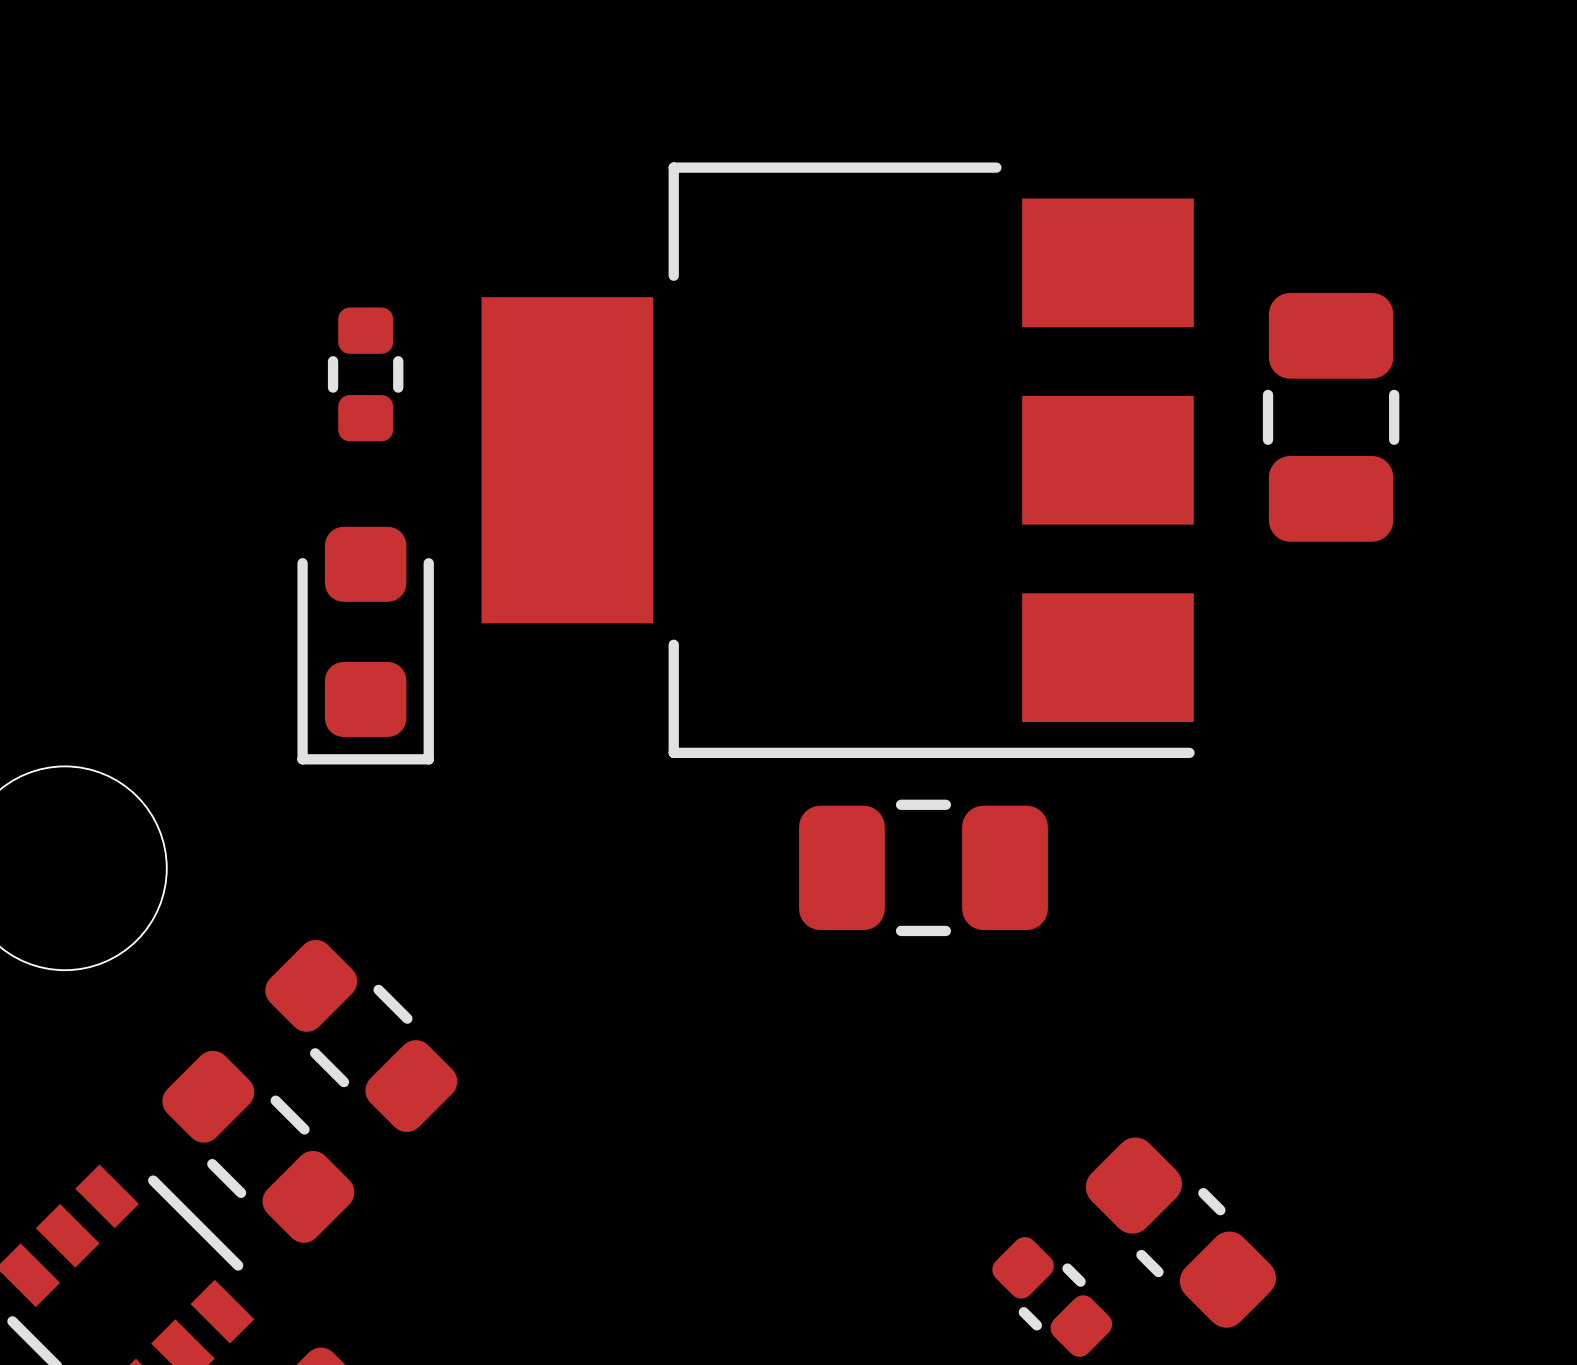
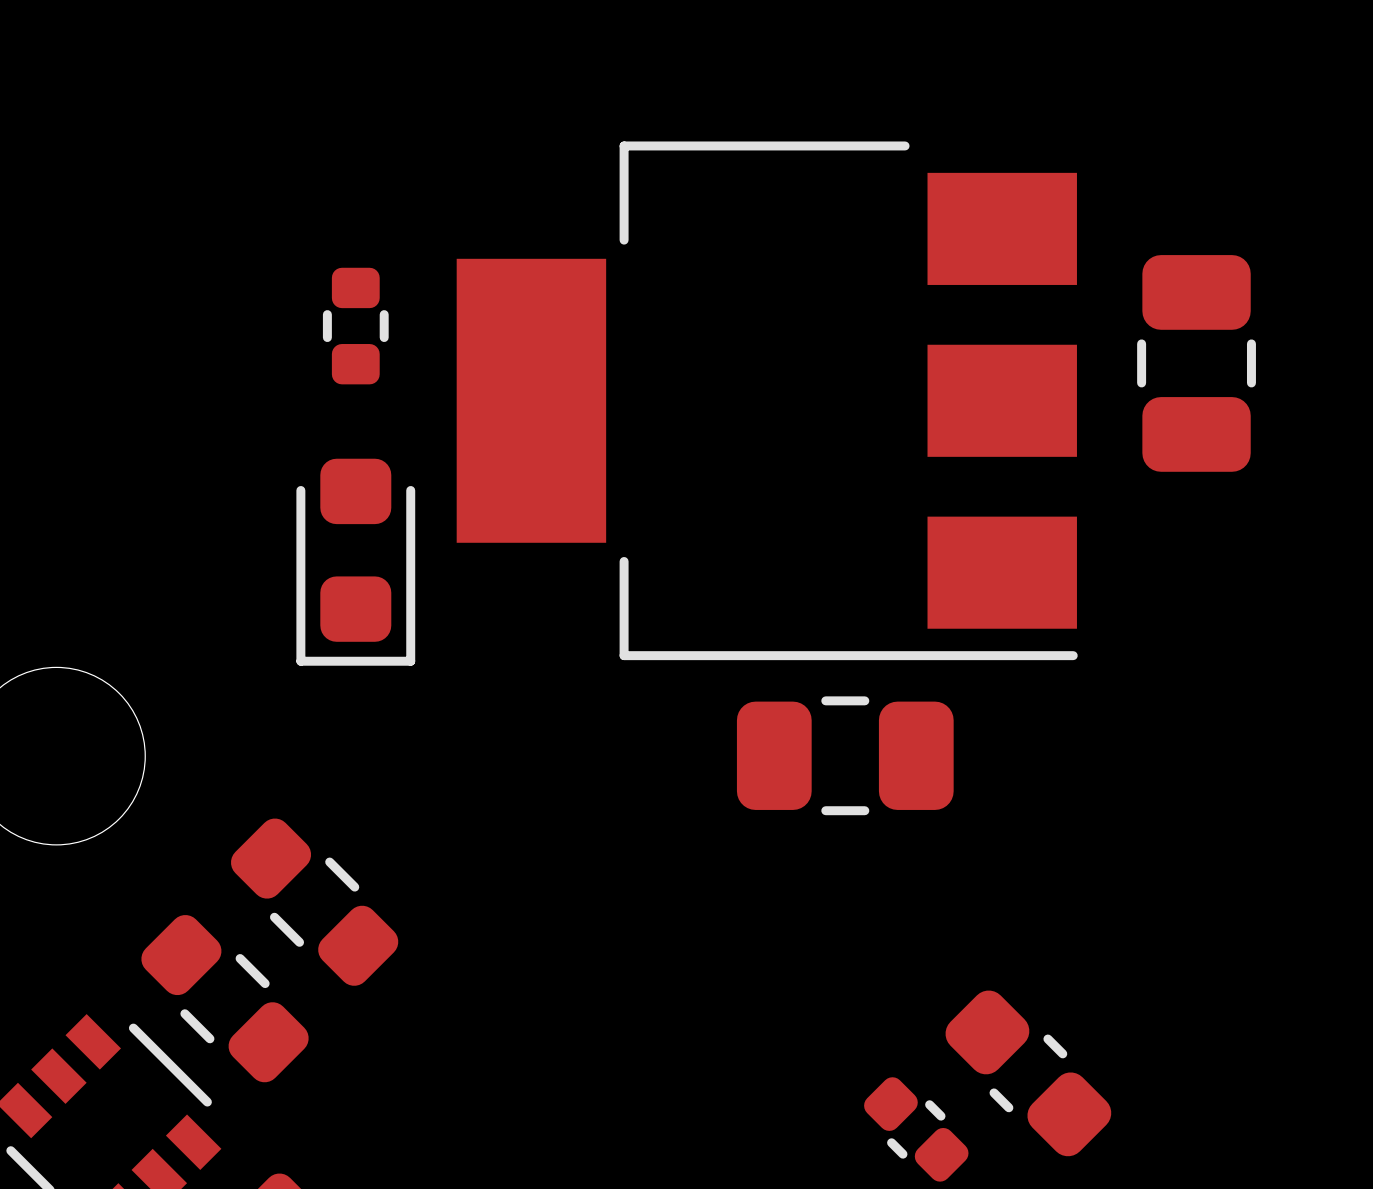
part position: (365, 374) -> (355, 326)
part position: (1331, 417) -> (1196, 363)
part position: (838, 460) -> (767, 400)
part position: (365, 645) -> (355, 562)
part position: (923, 867) -> (845, 755)

